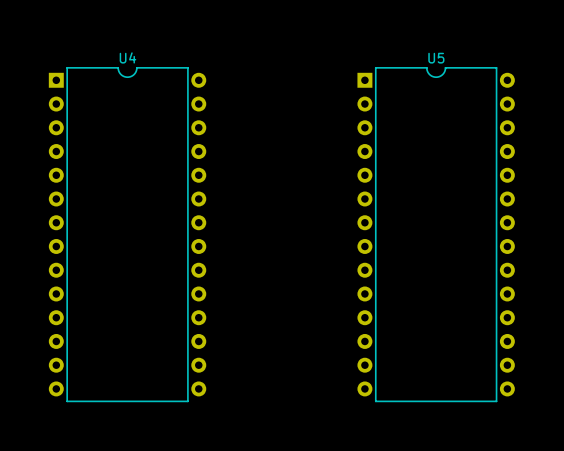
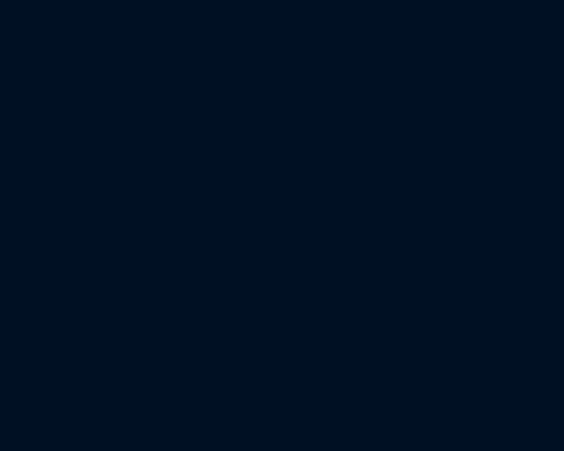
U4: (127, 234) -> none
U5: (436, 234) -> none

